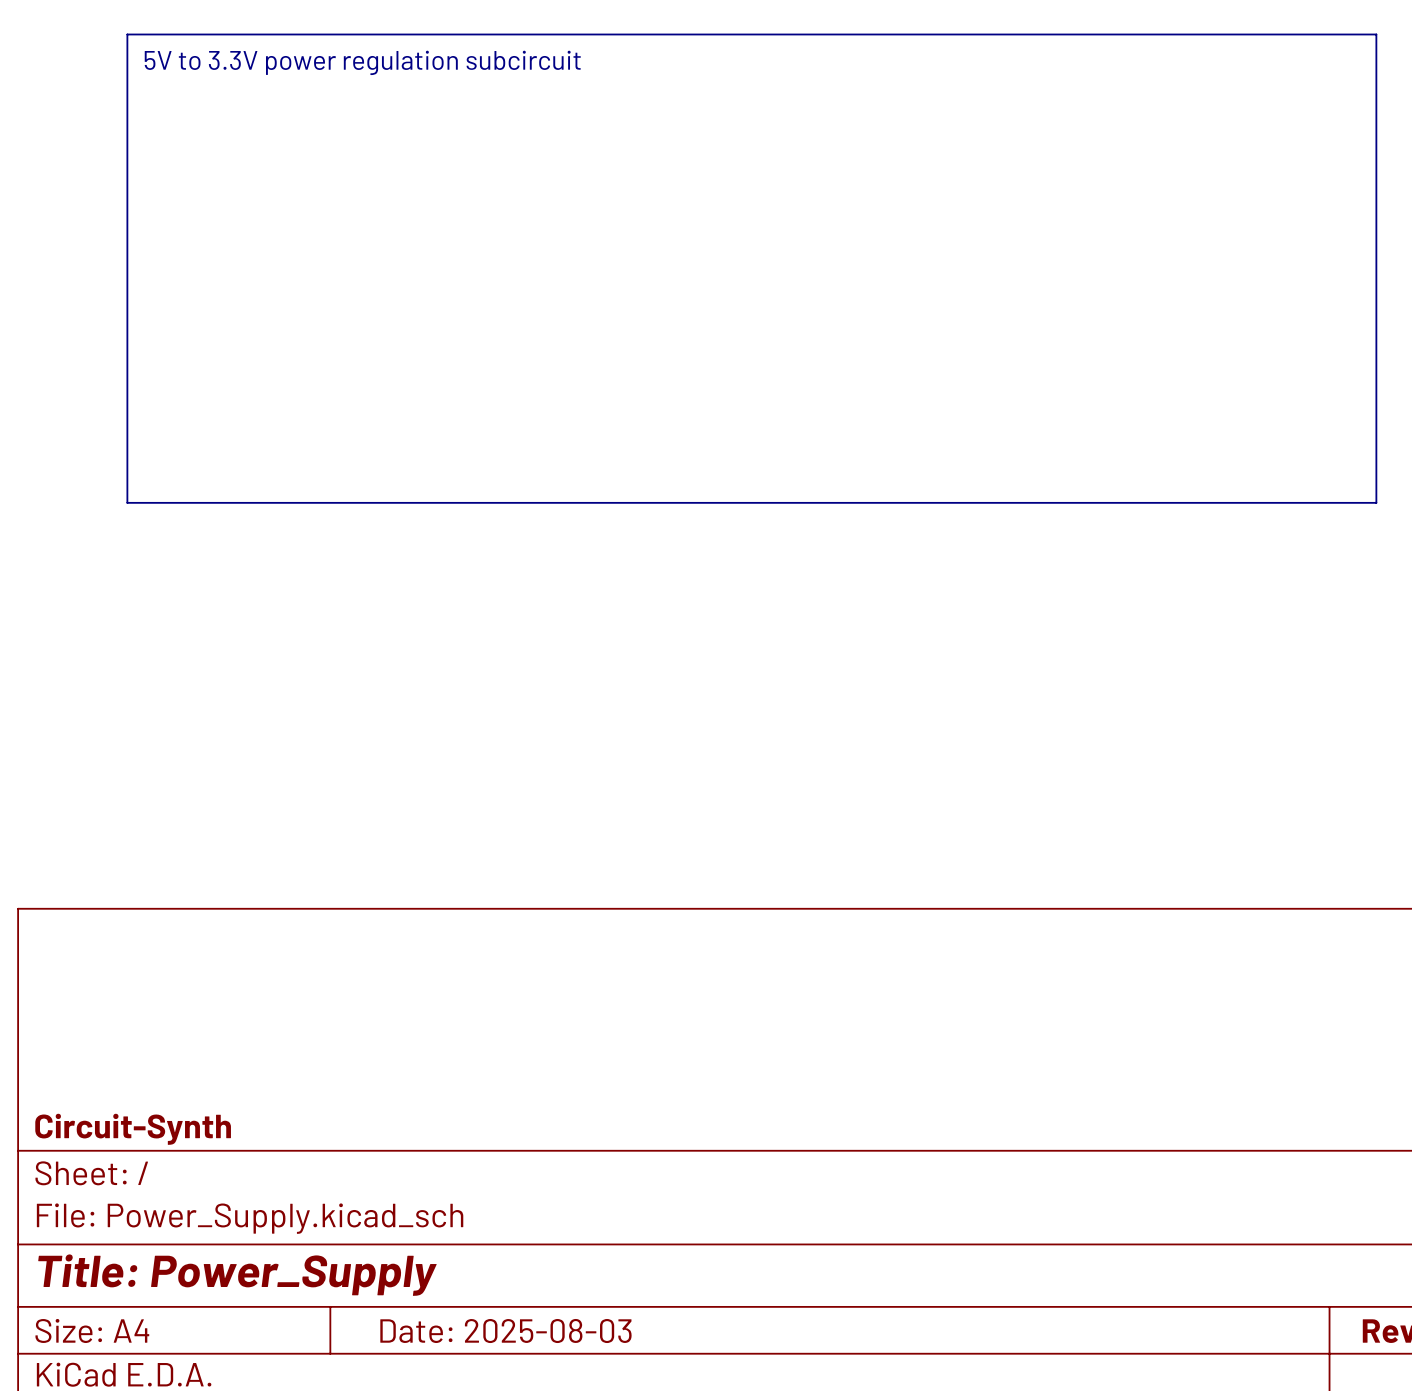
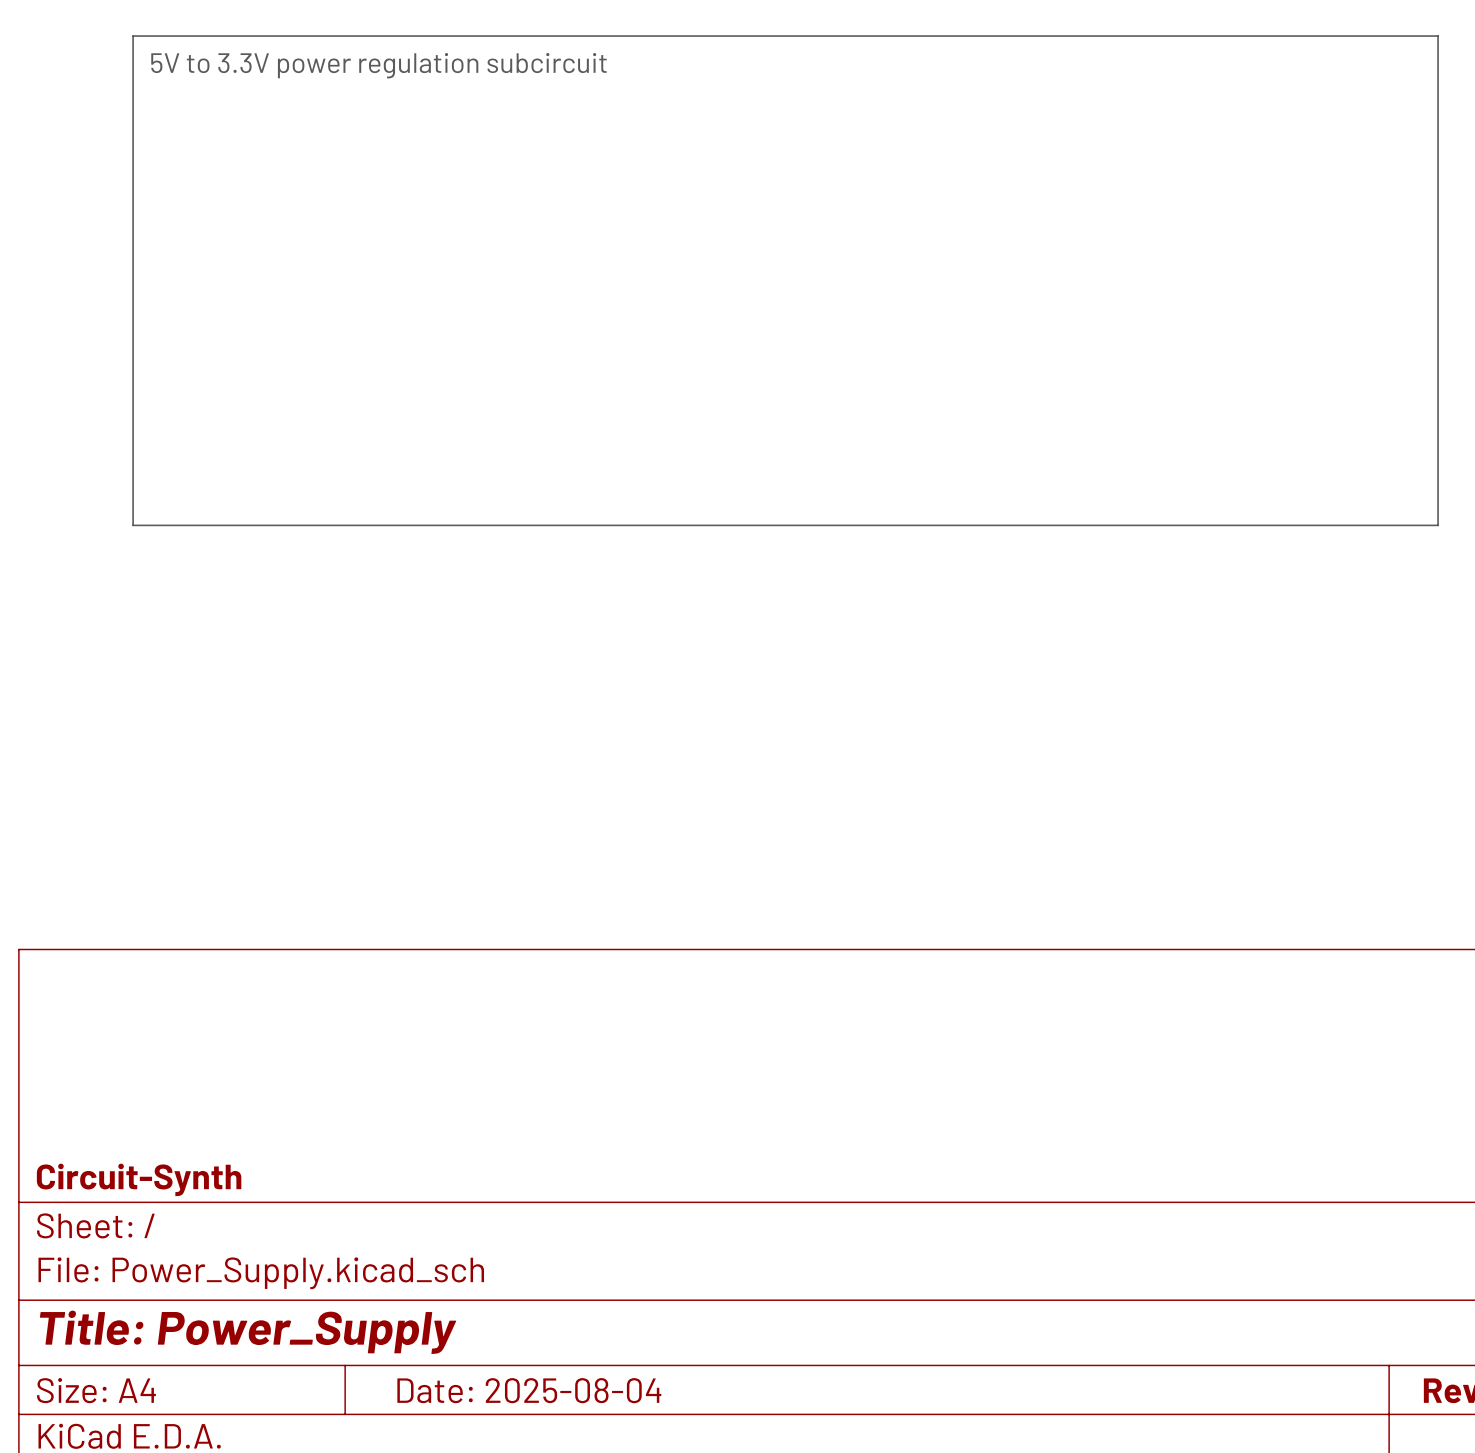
title block: Date: 2025-08-03 (505, 1331) -> Date: 2025-08-04 (529, 1390)

